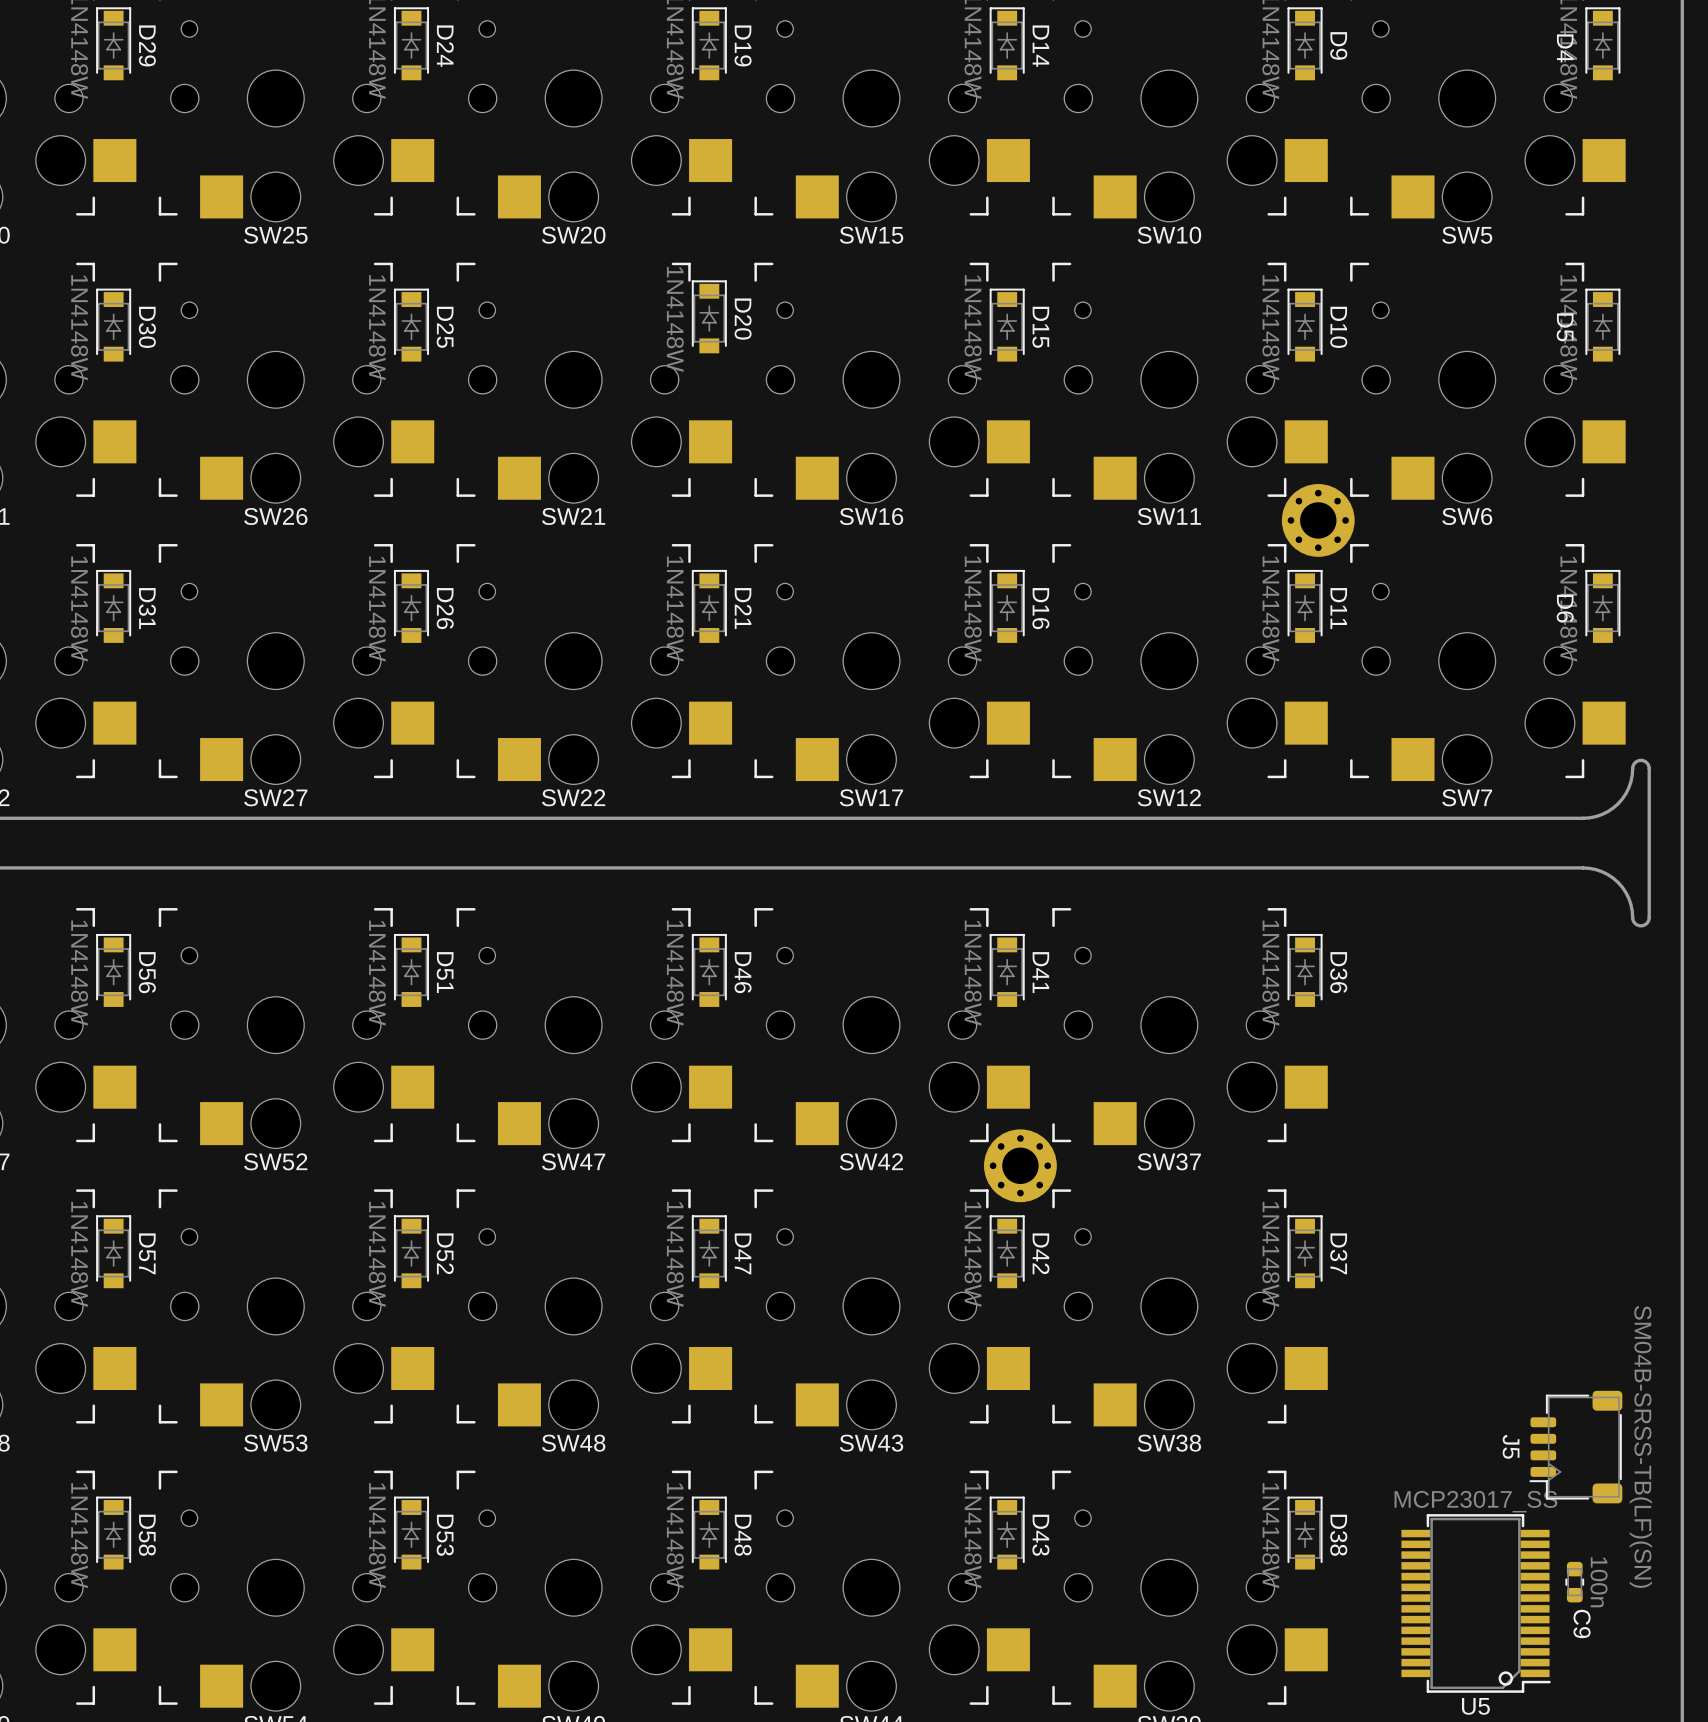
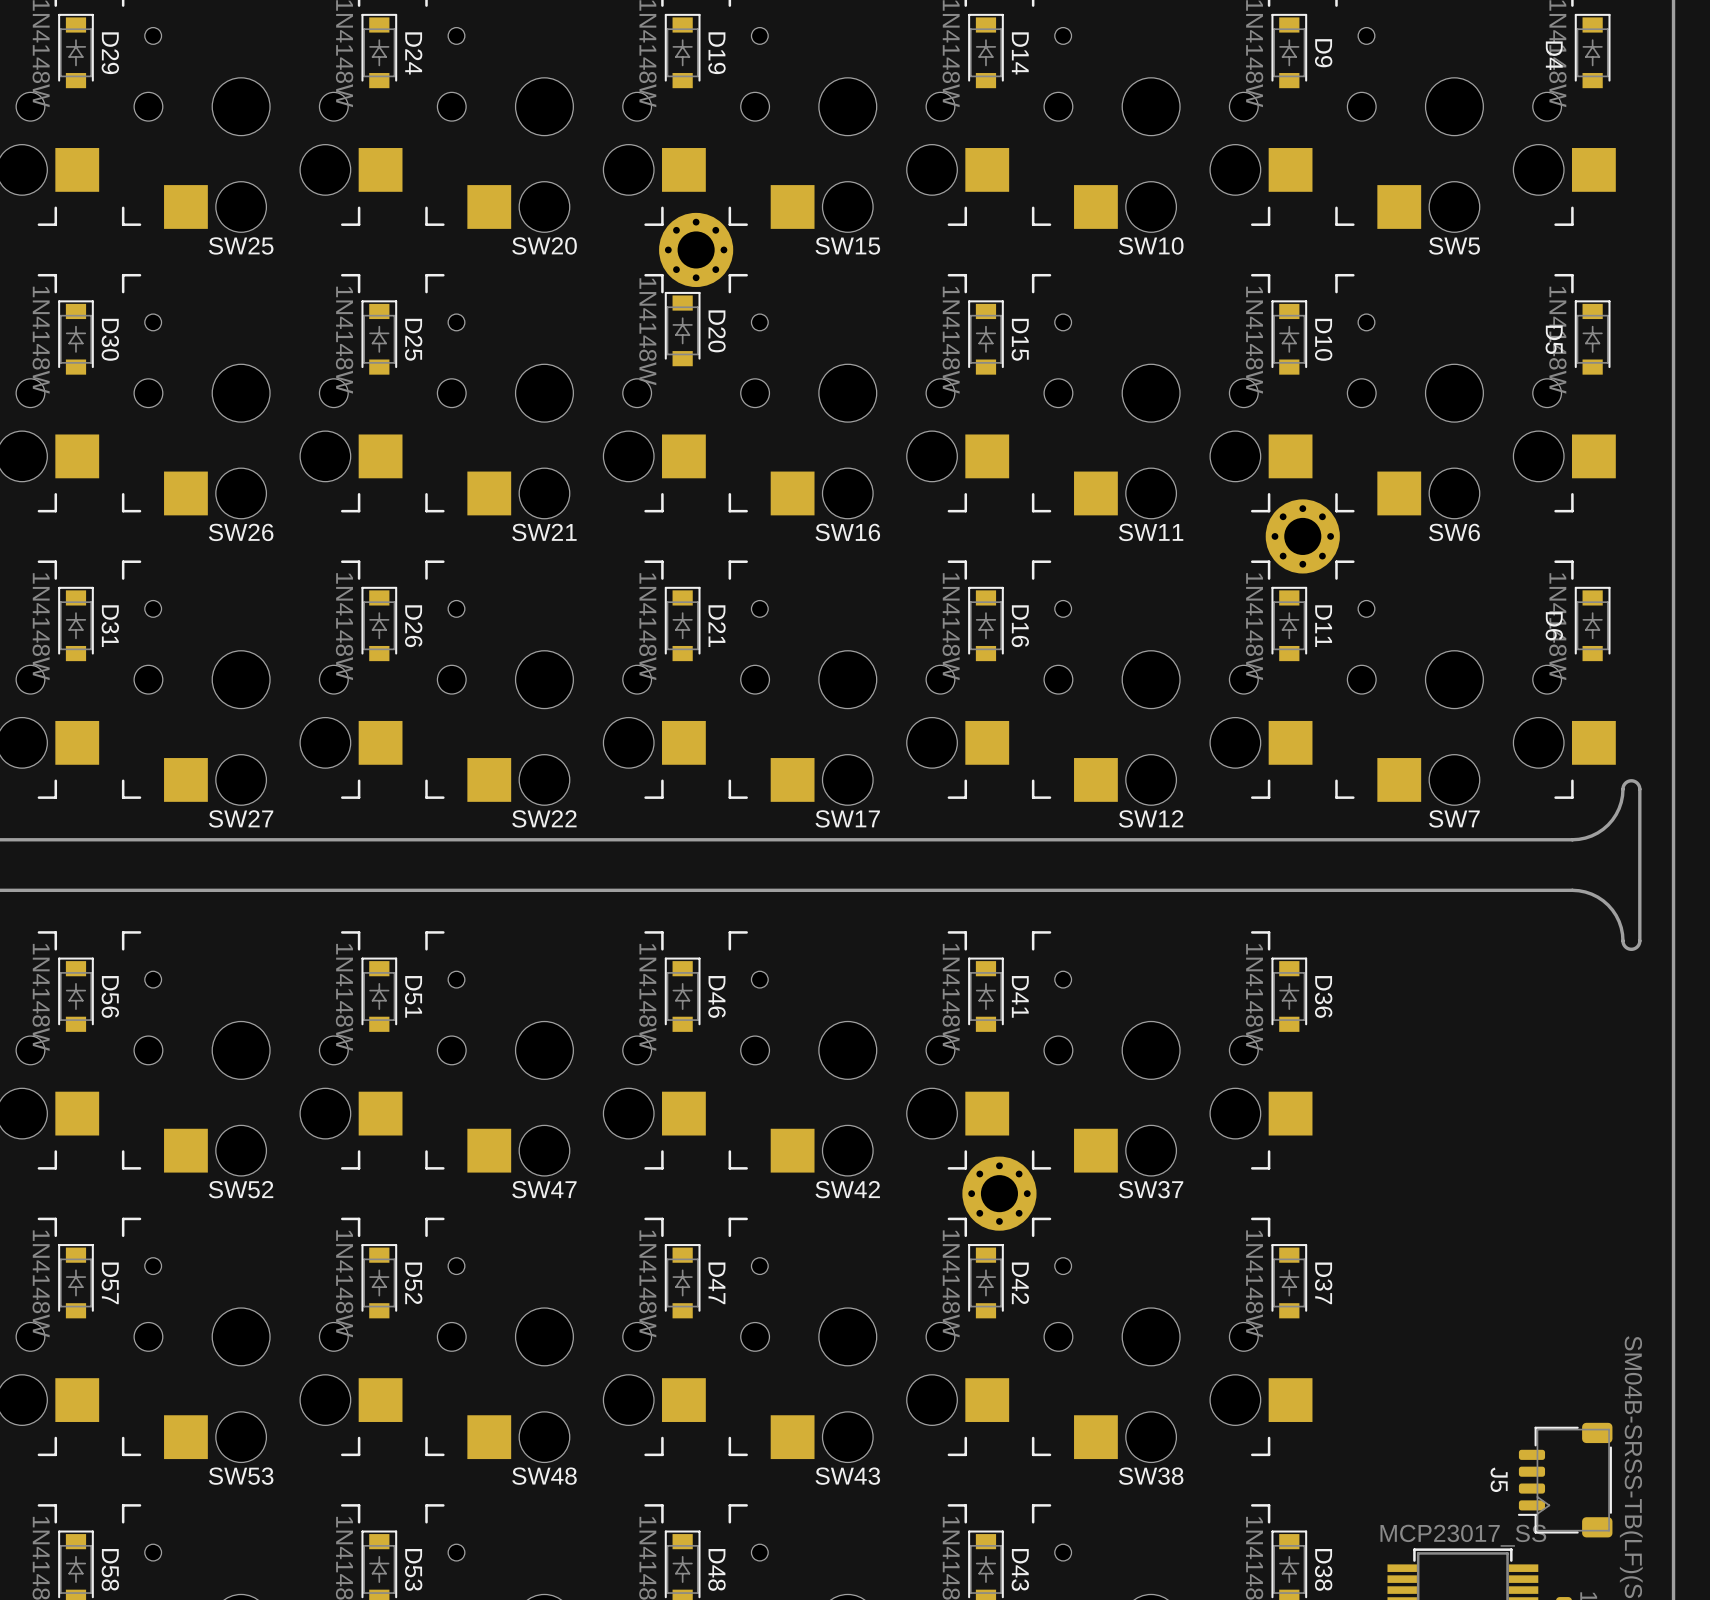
part: none -> (696, 249)

